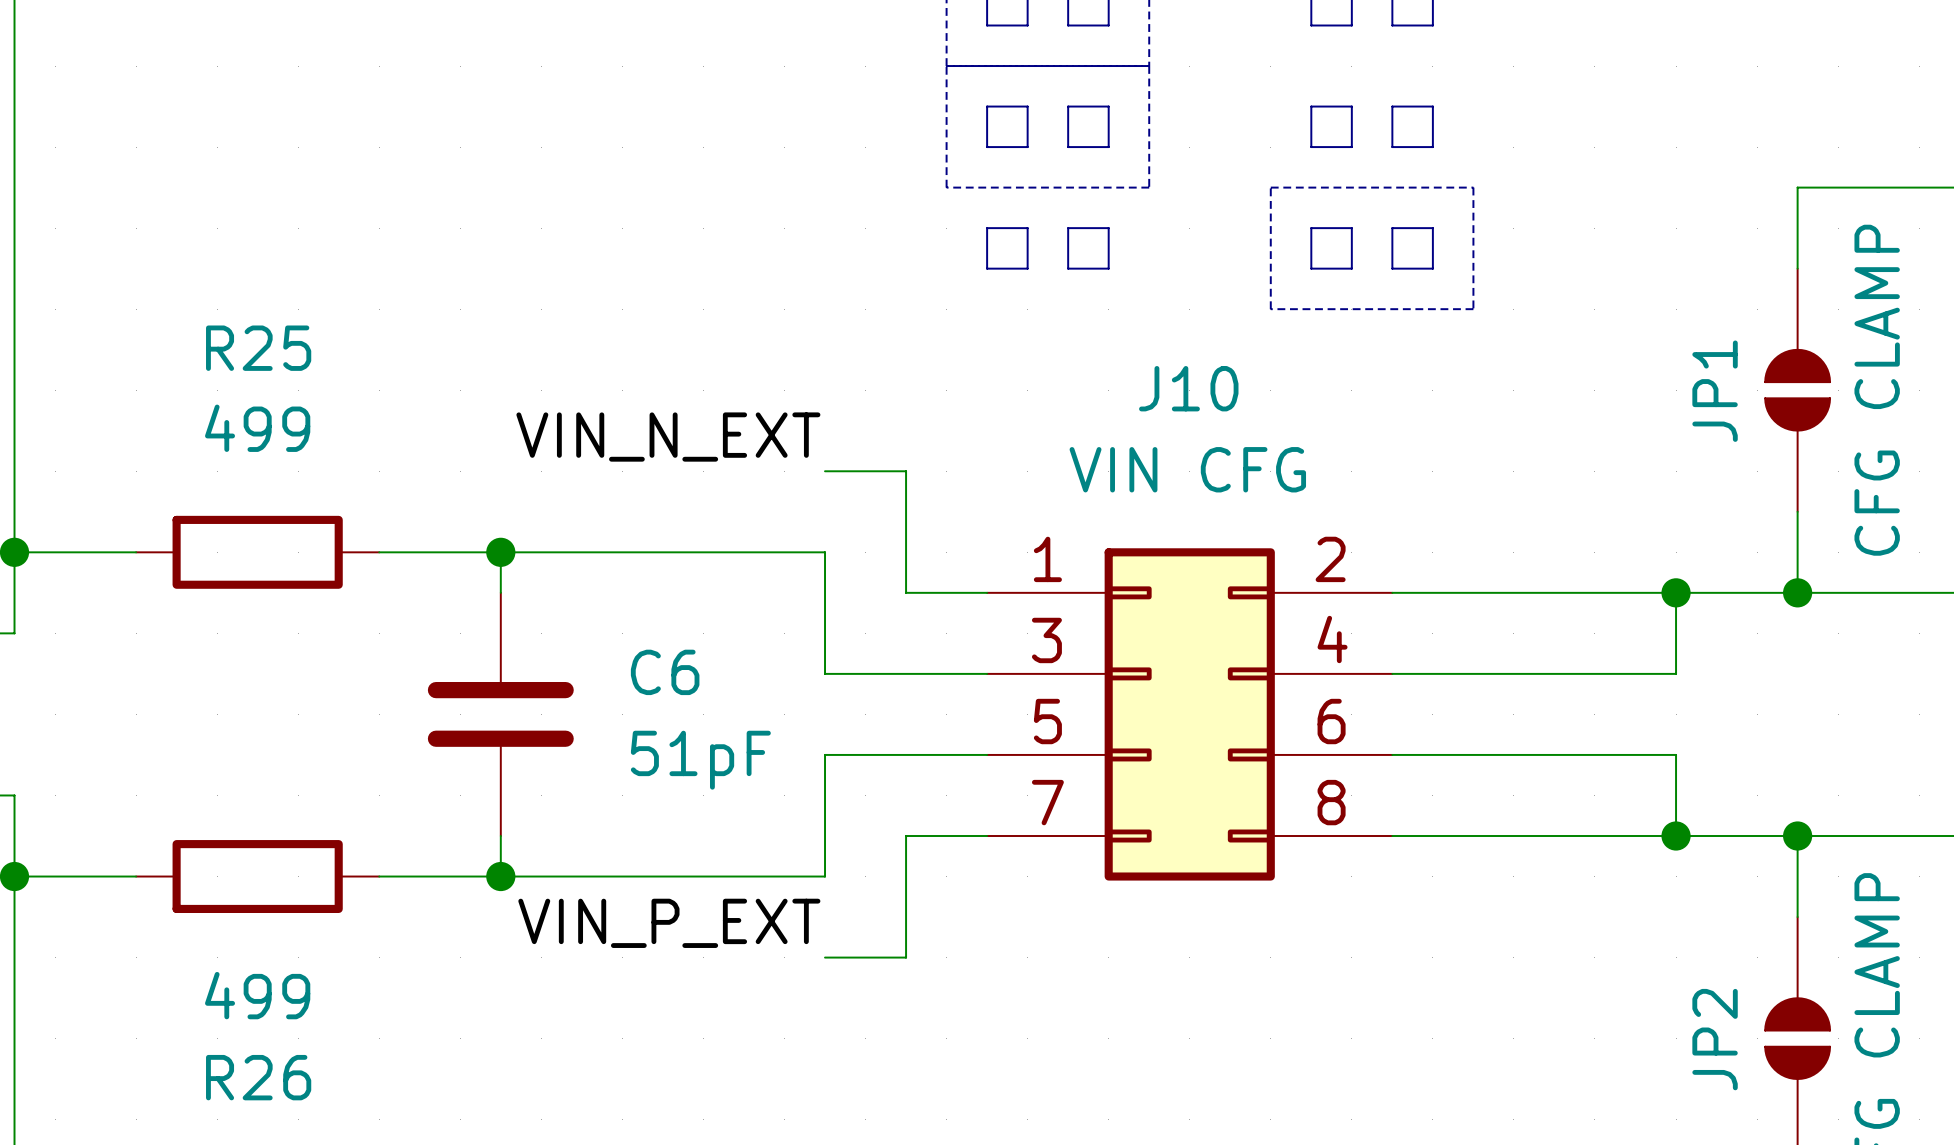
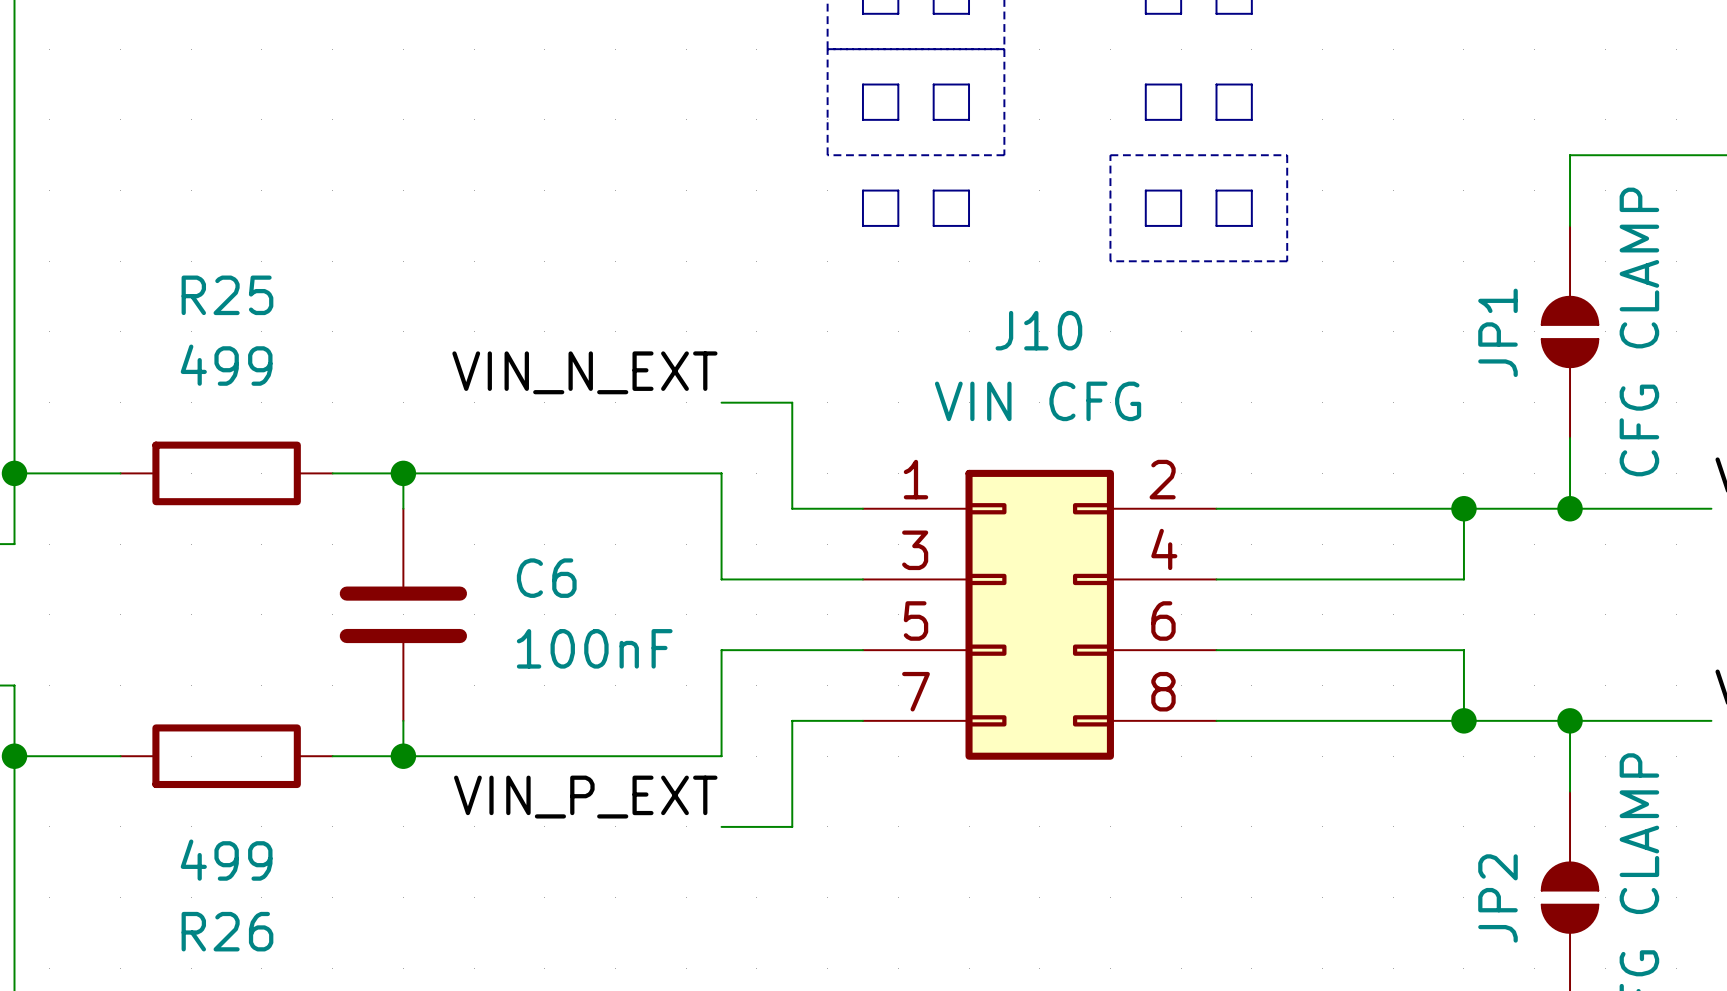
wire: (500, 552) (500, 592) -> (403, 473) (403, 508)
junction position: (500, 552) -> (403, 473)
C6 position: (500, 714) -> (403, 614)
C6 value: 51pF (700, 760) -> 100nF (594, 648)
wire: (500, 836) (500, 876) -> (403, 720) (403, 756)
junction position: (500, 876) -> (403, 756)

